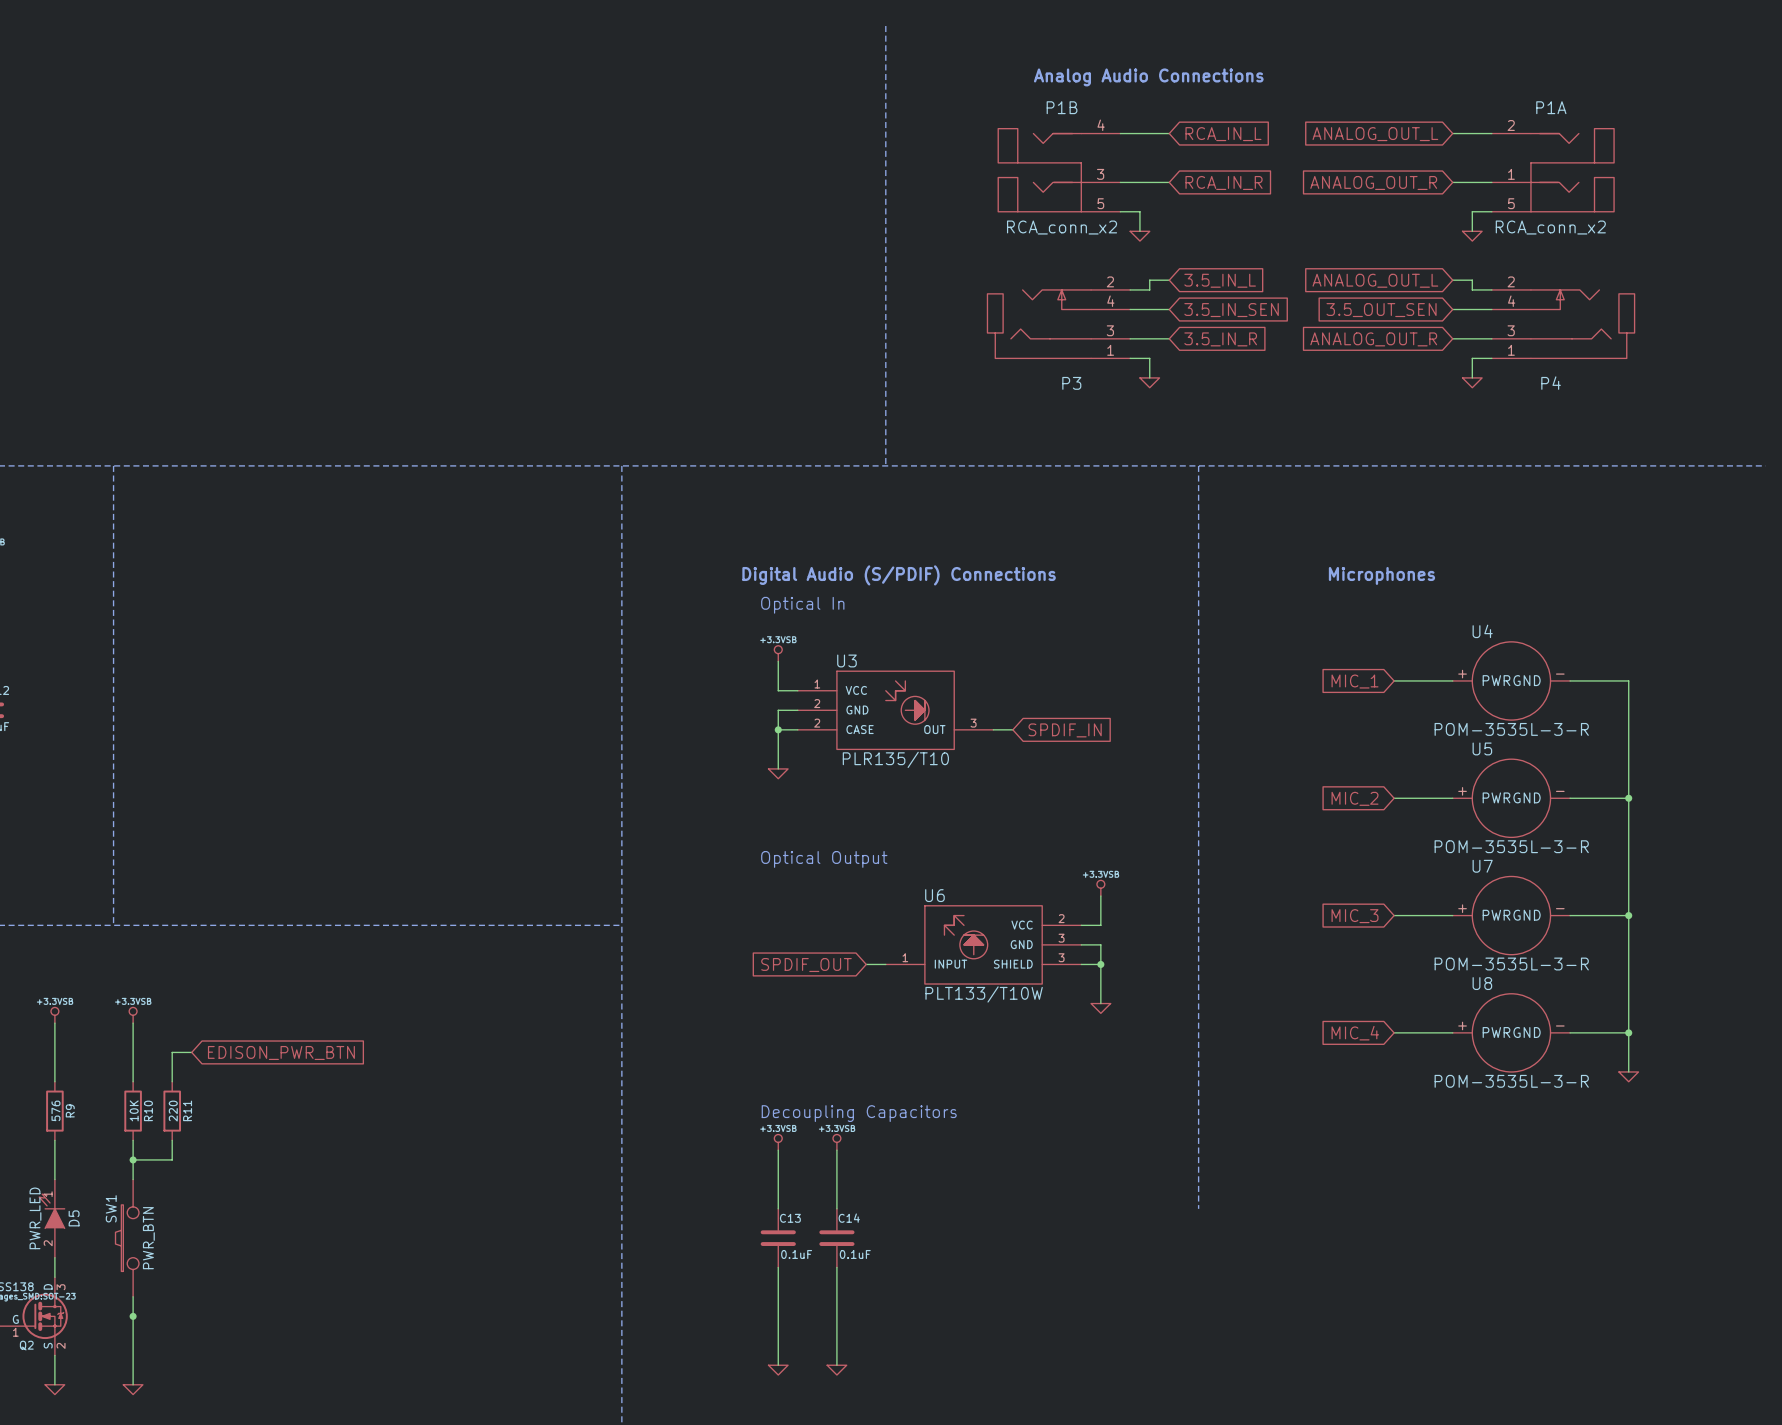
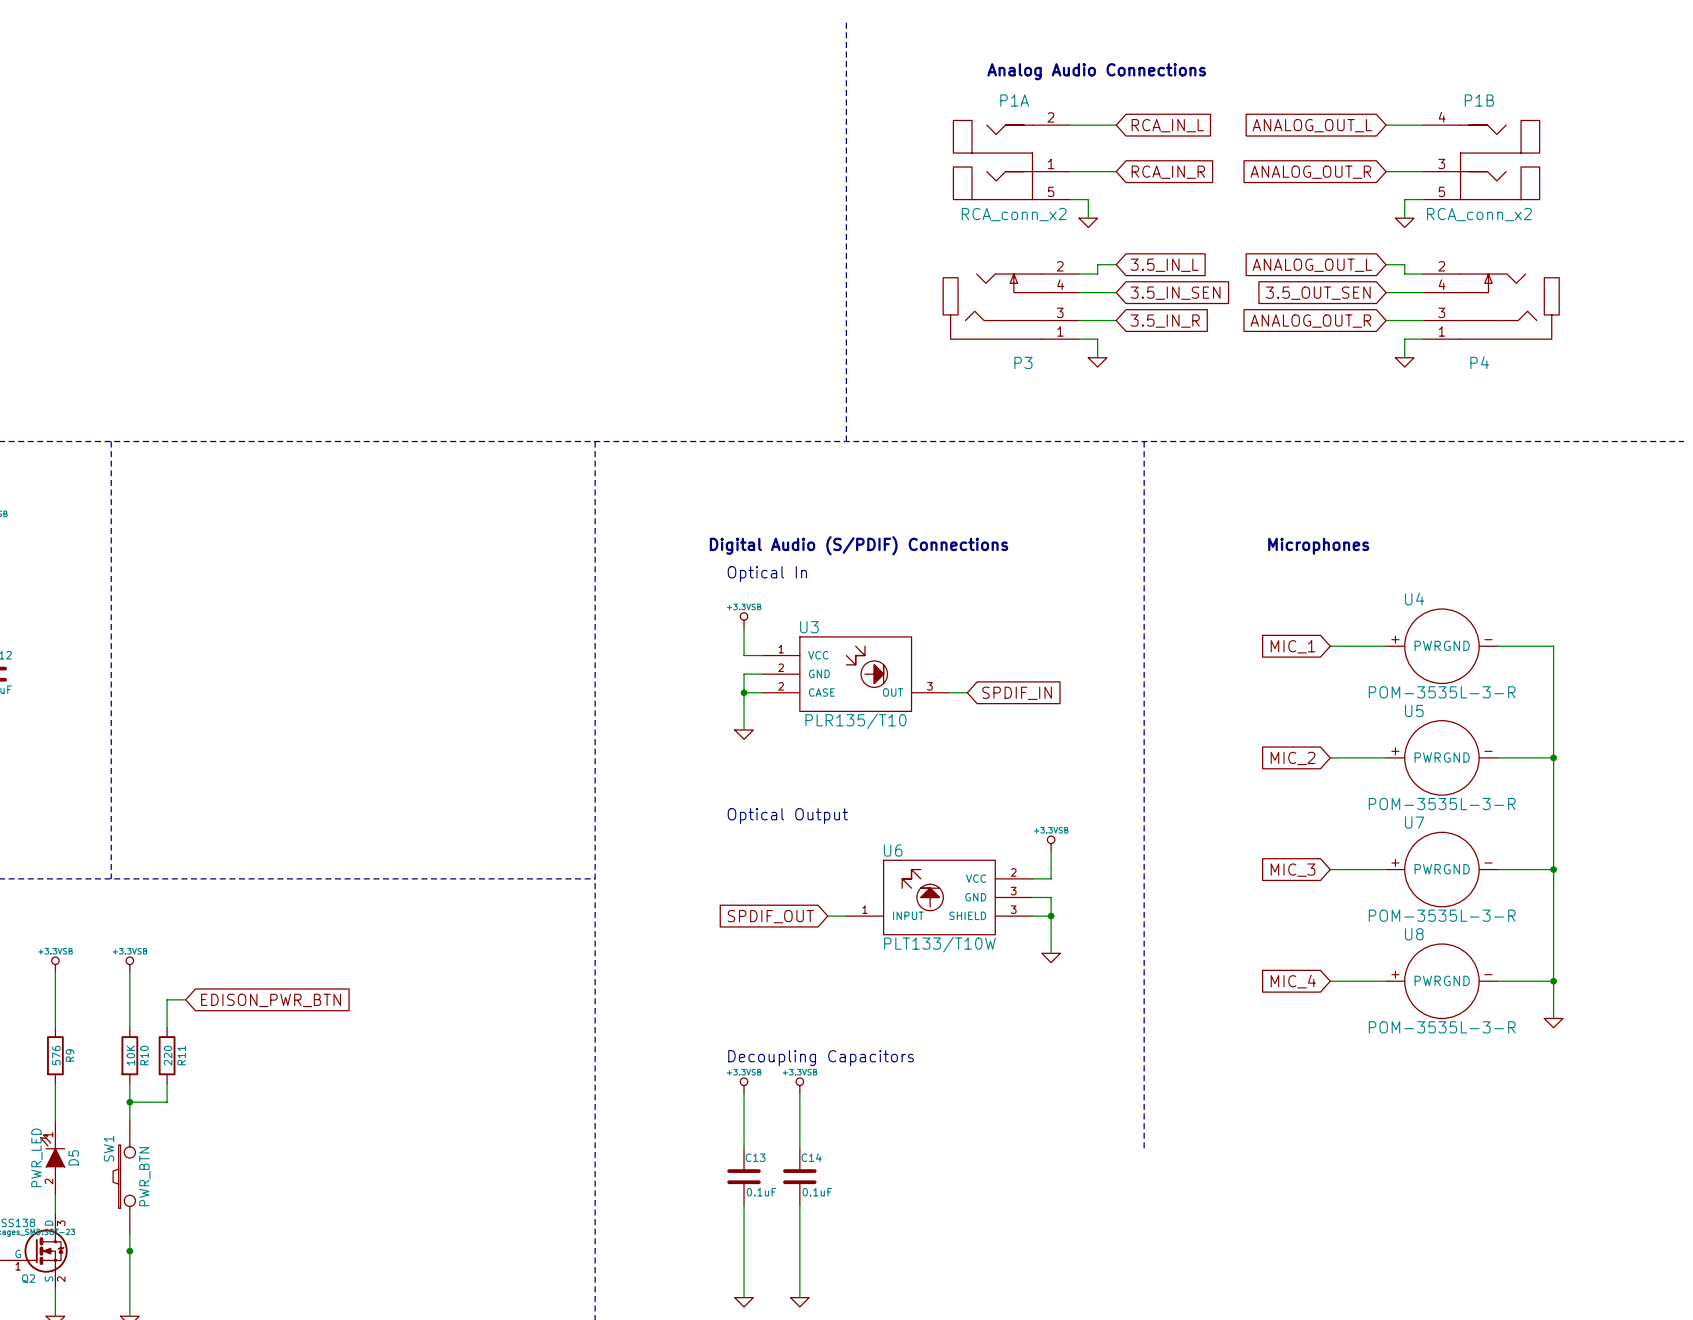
P1B flip: as is (1039, 170) -> left-right (1500, 160)
P1B position: (1059, 170) -> (1481, 160)
P1A position: (1552, 170) -> (1011, 160)
P1A flip: as is (1572, 170) -> left-right (992, 160)

